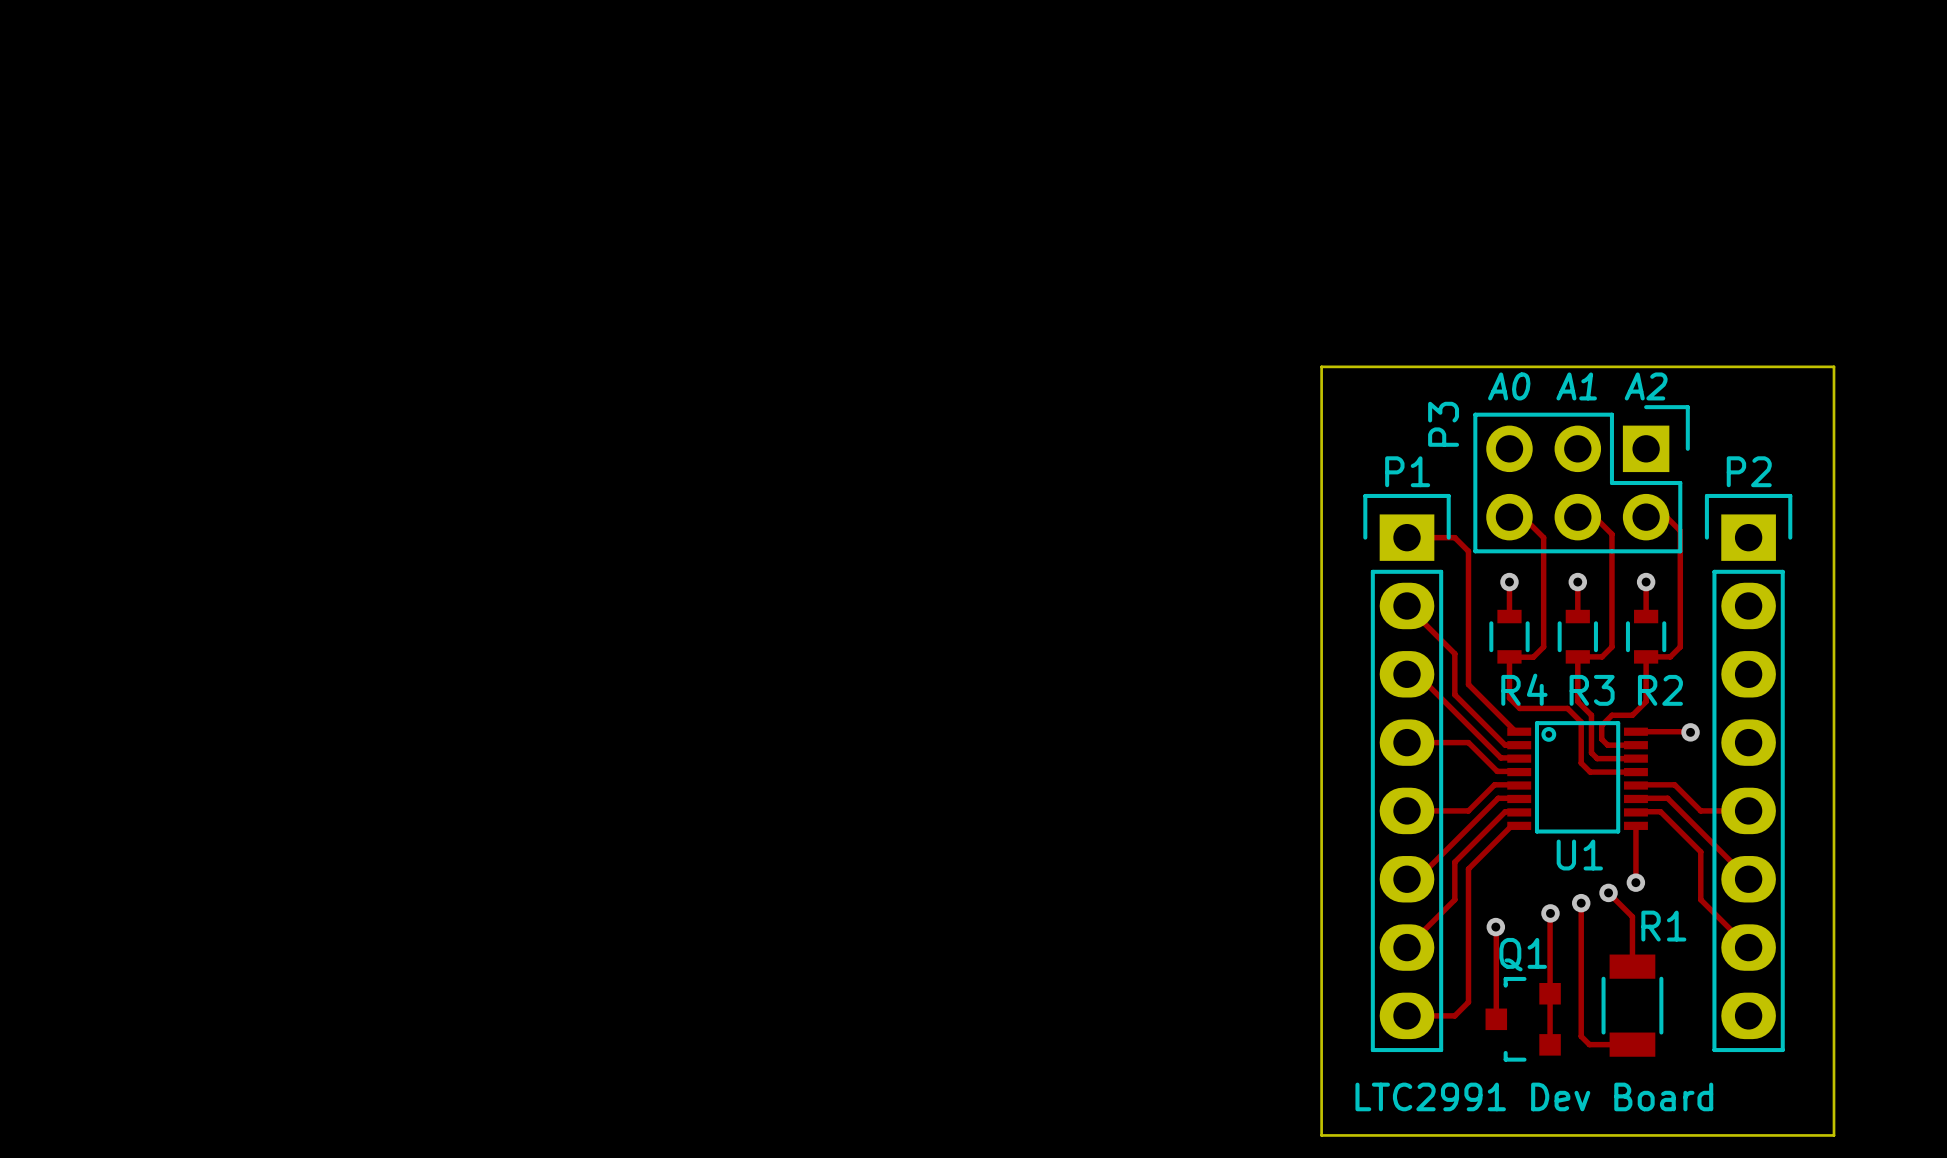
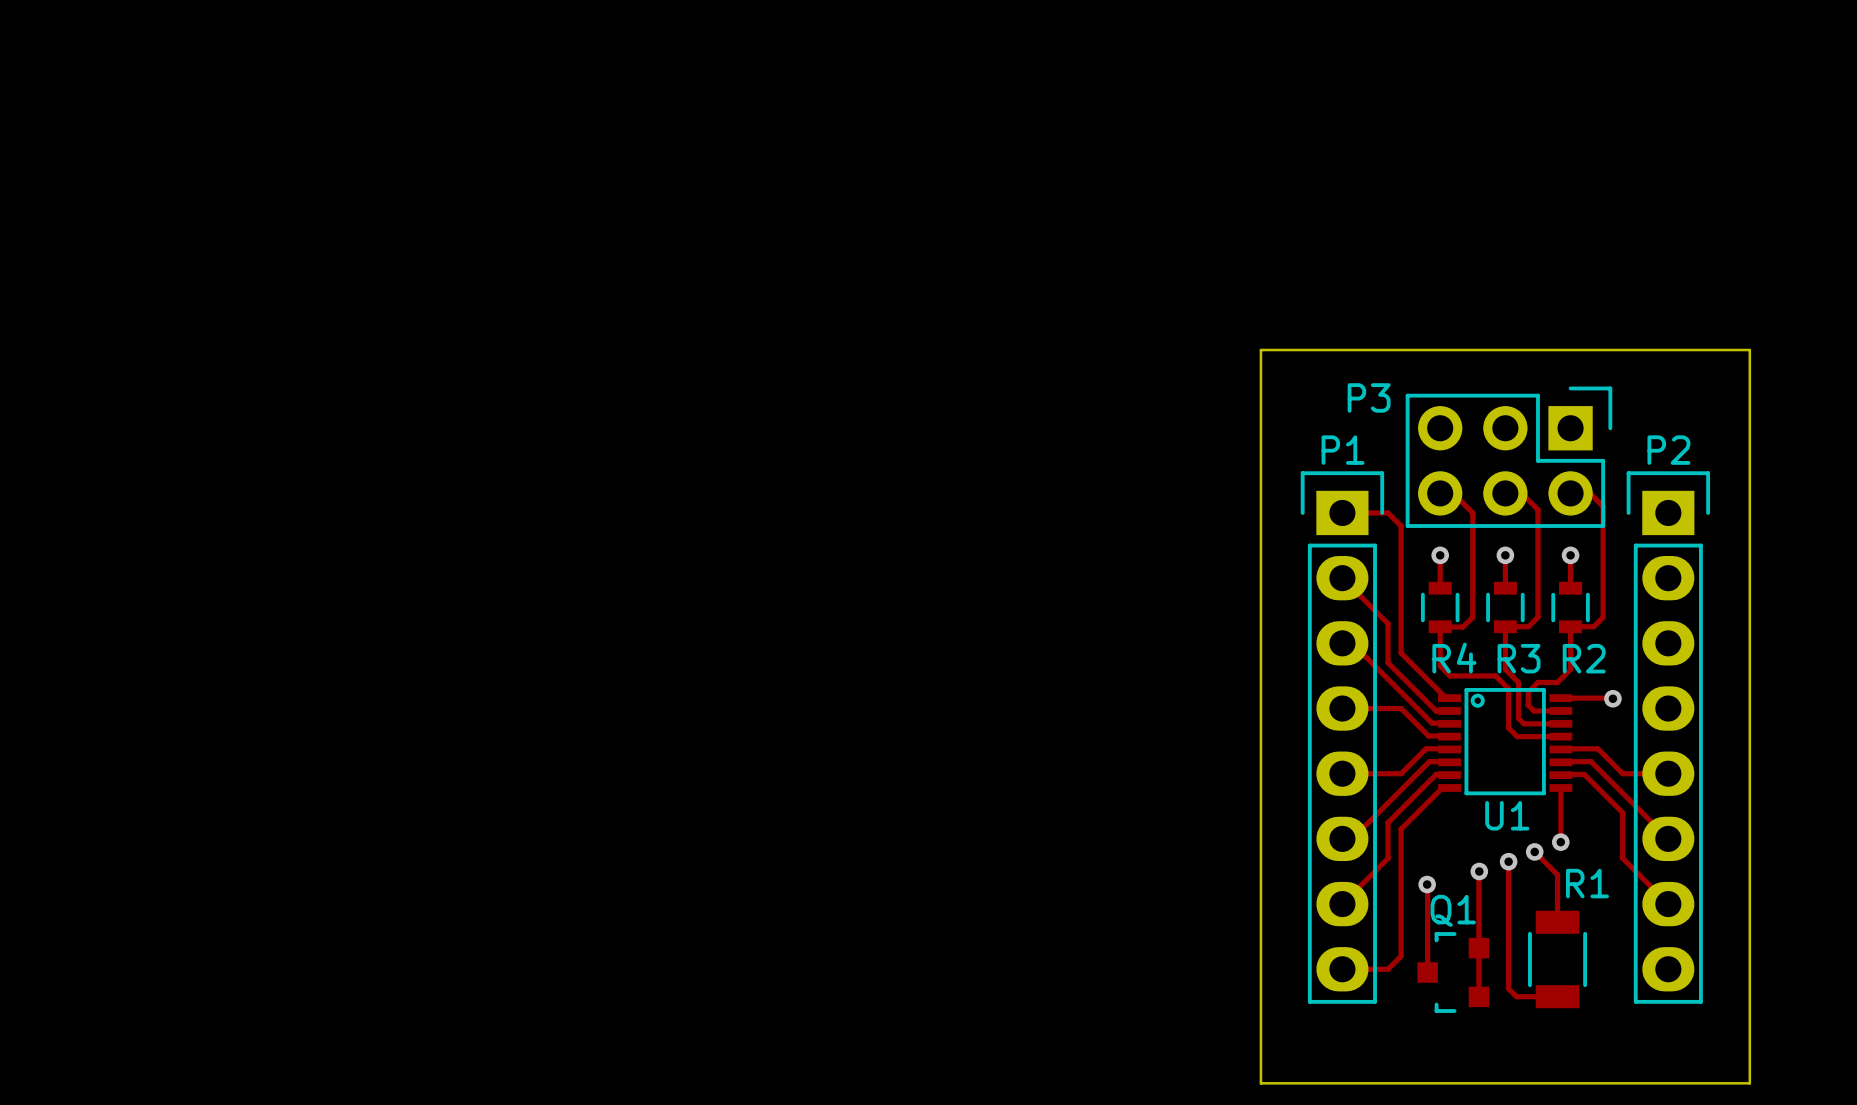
text: A0 (1509, 386) -> none
text: A1 (1576, 386) -> none
text: A2 (1646, 386) -> none
P3 name rotation: 0° (1443, 424) -> 90° clockwise (1369, 397)
text: LTC2991 Dev Board (1534, 1096) -> none

